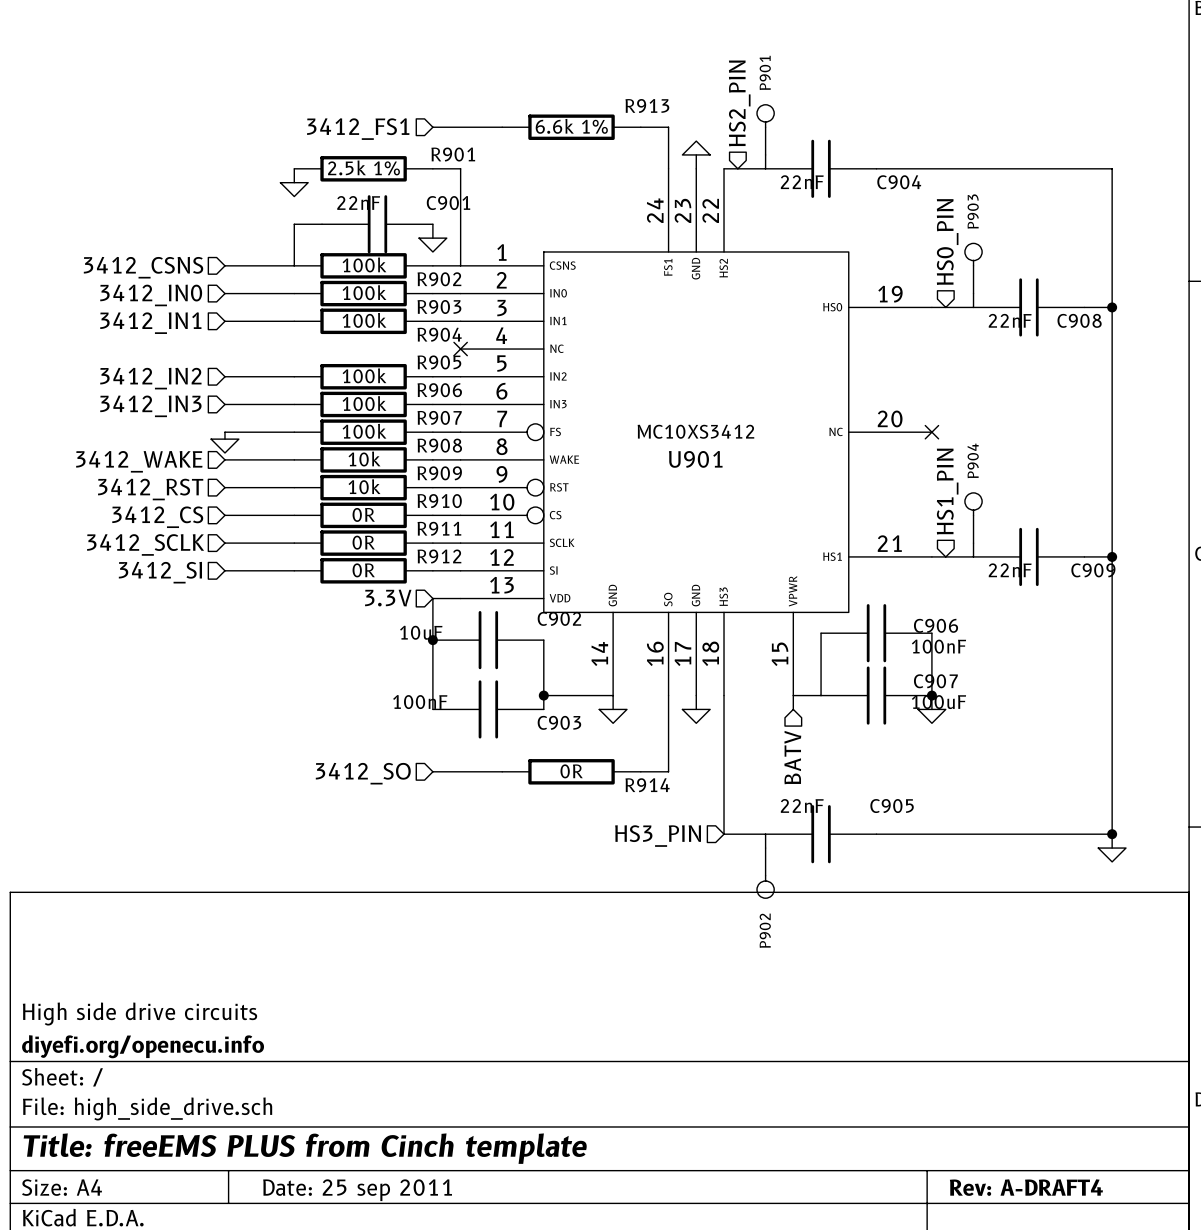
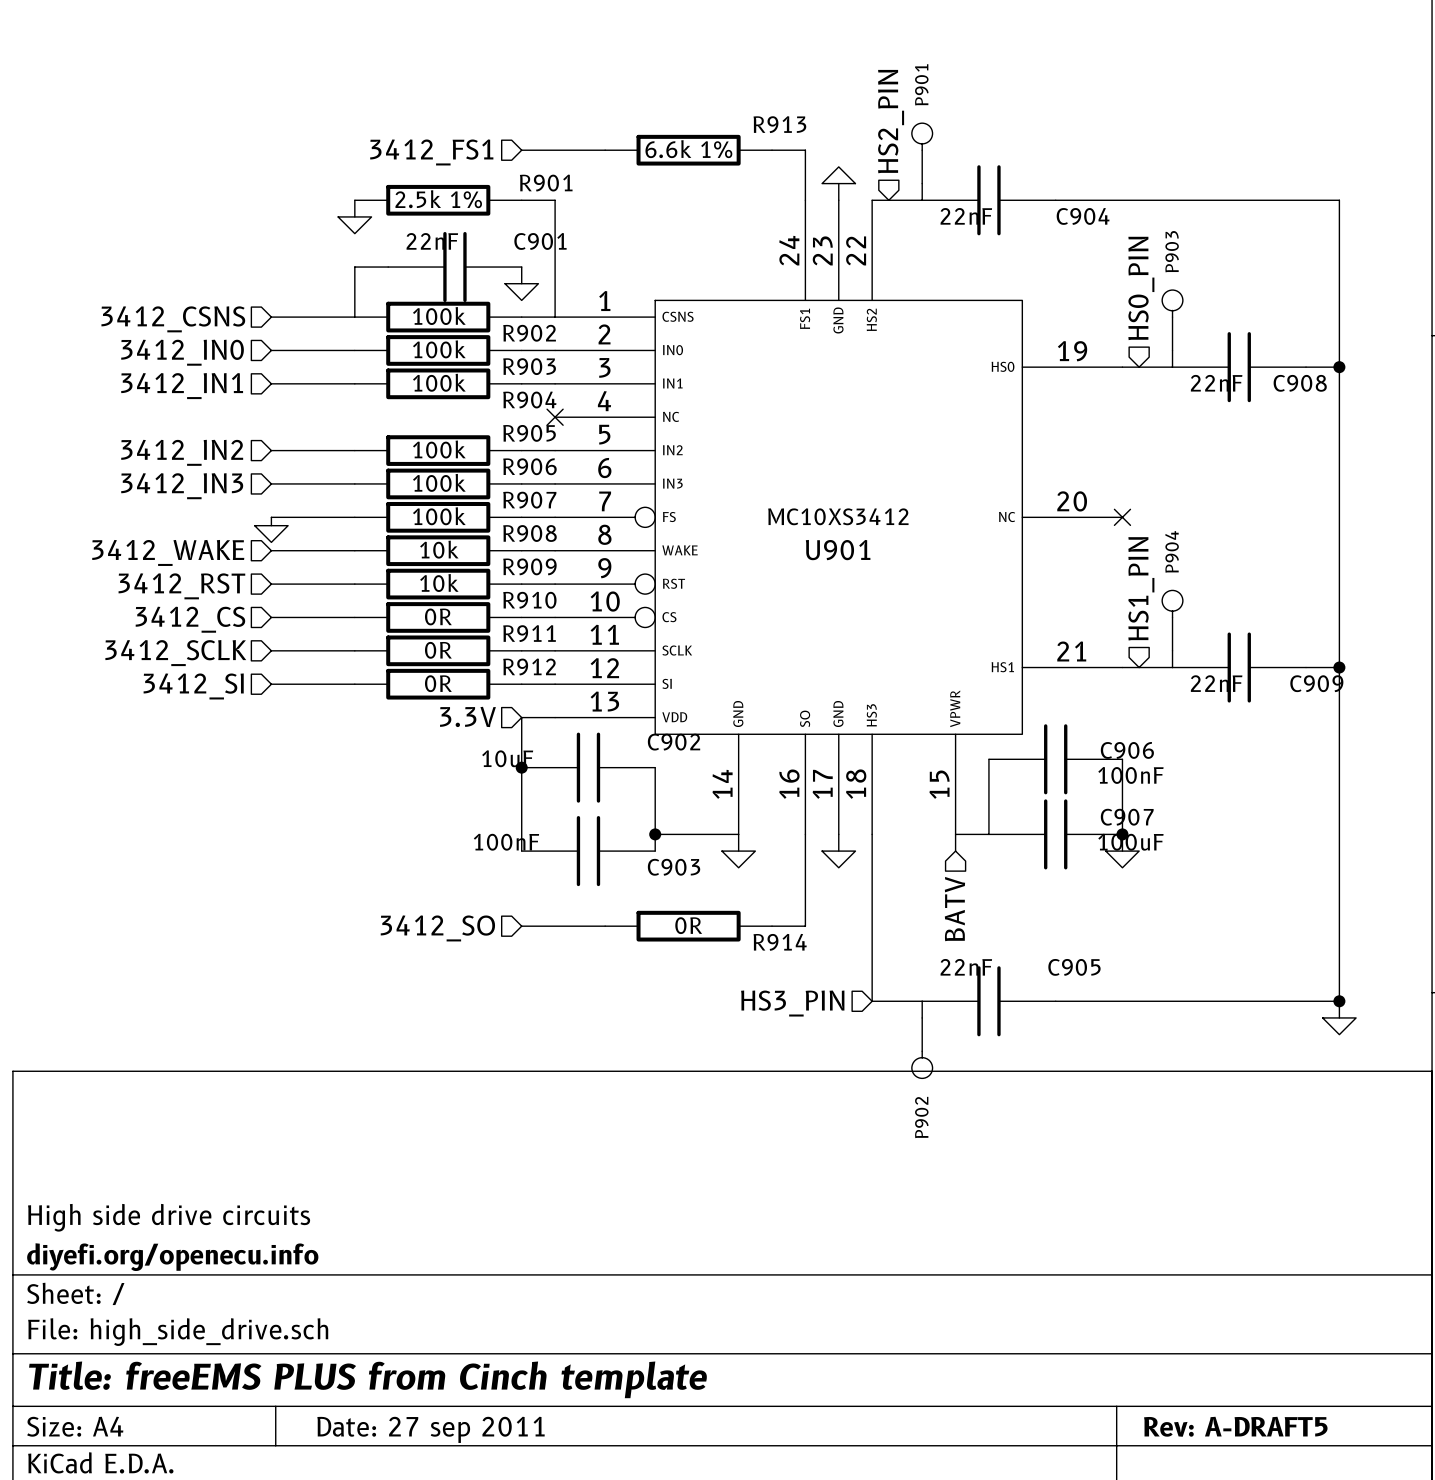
title block: Rev: A-DRAFT4 (1026, 1187) -> Rev: A-DRAFT5 (1235, 1426)
title block: Date: 25 sep 2011 (357, 1190) -> Date: 27 sep 2011 (431, 1429)

